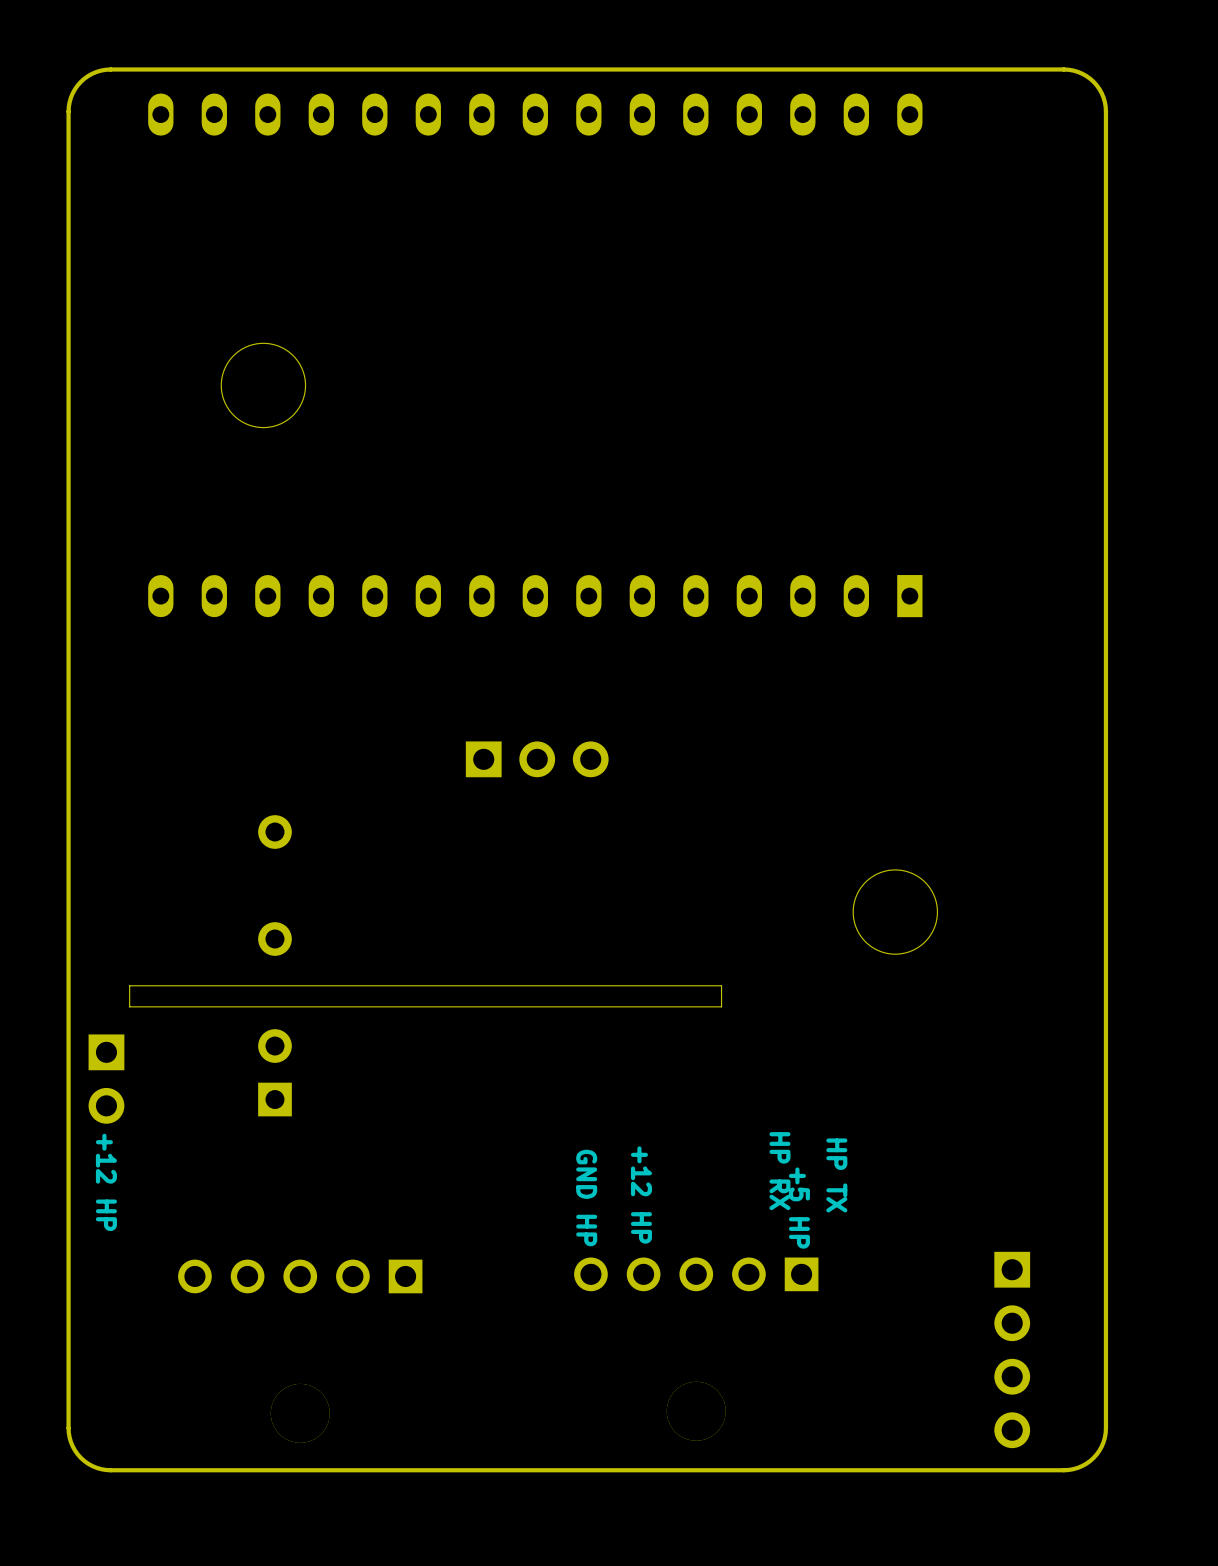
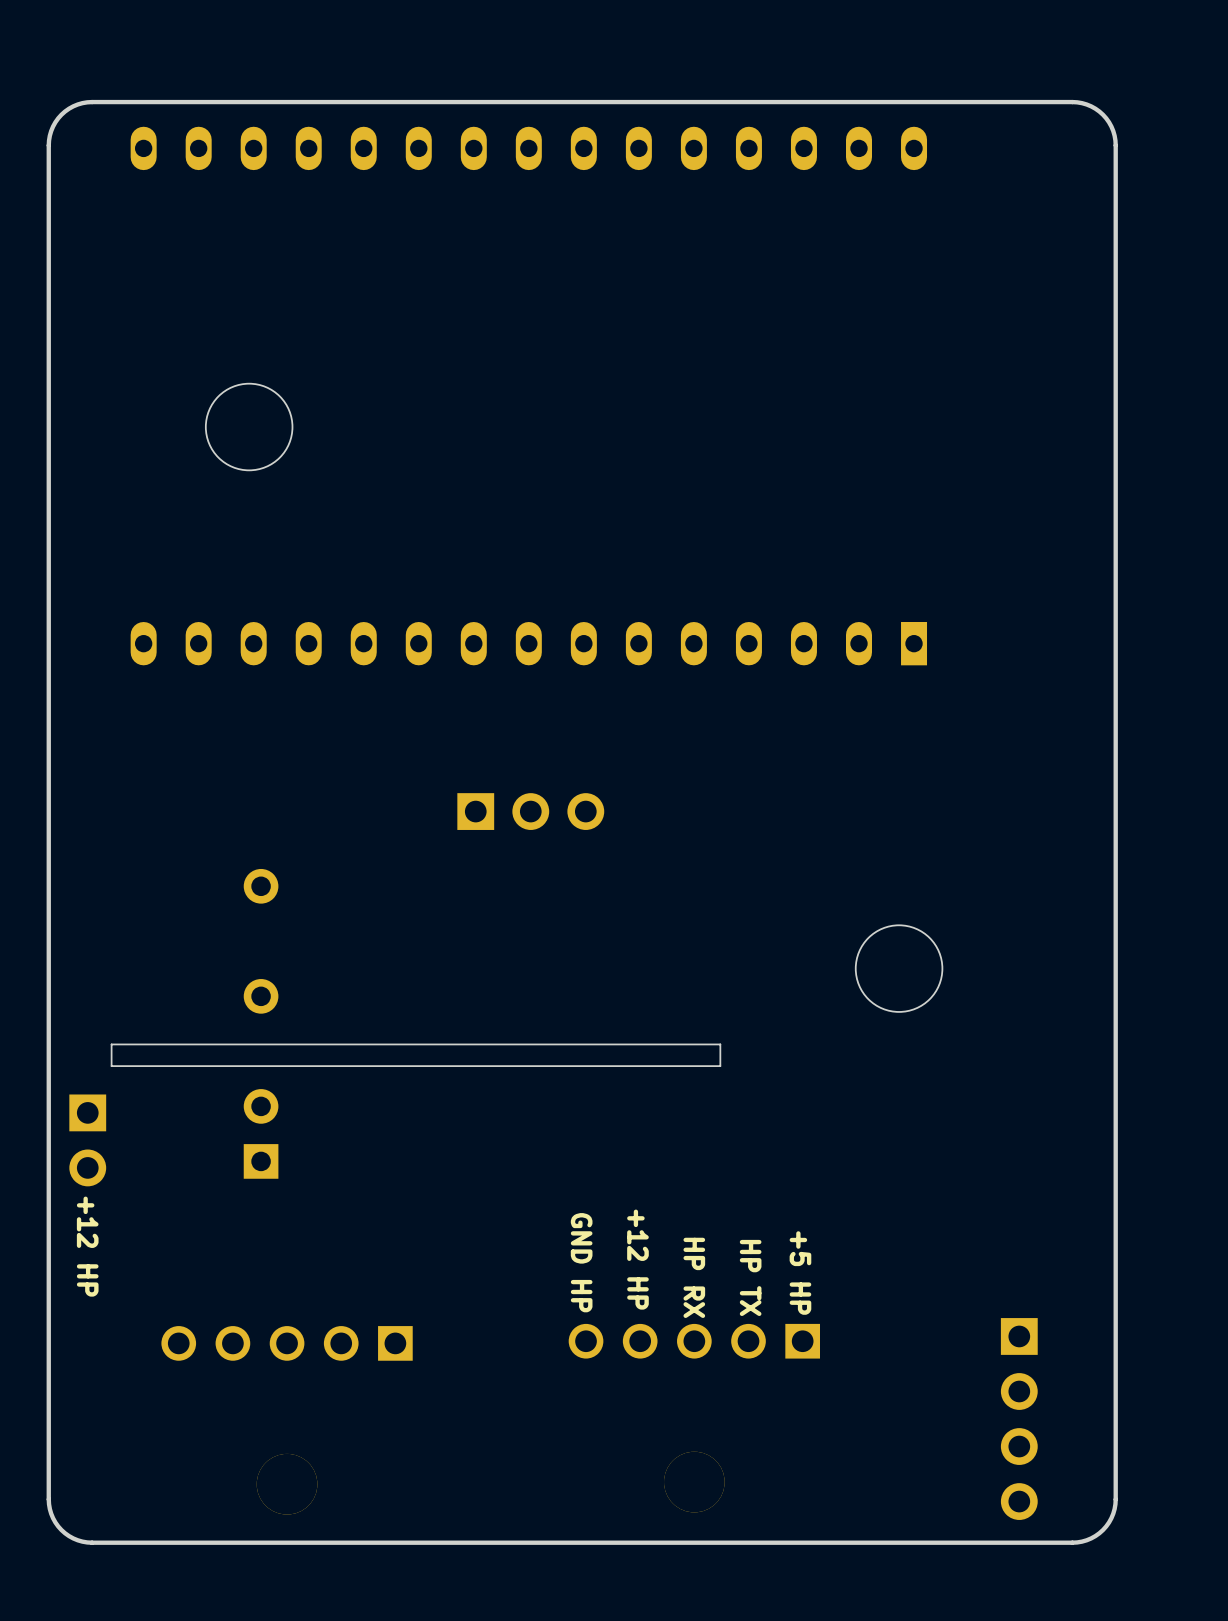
text position: HP RX (779, 1171) -> HP RX (694, 1277)
text position: HP TX (836, 1175) -> HP TX (750, 1277)

